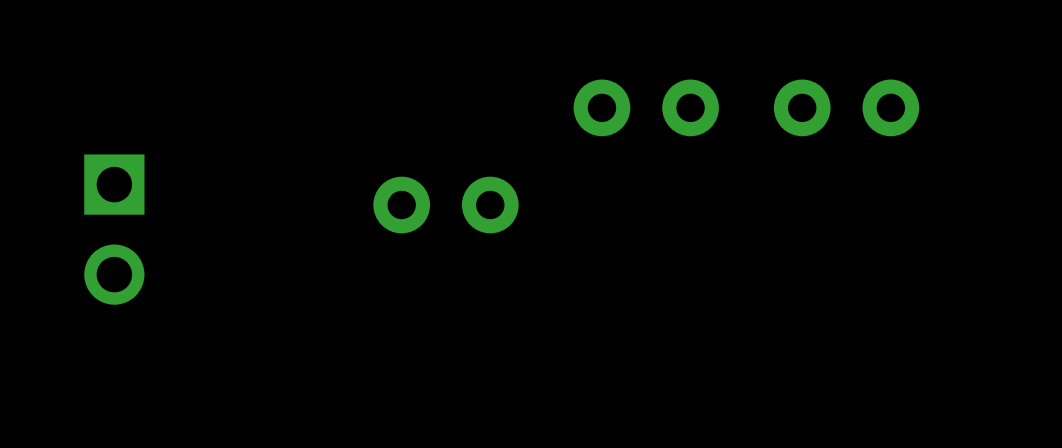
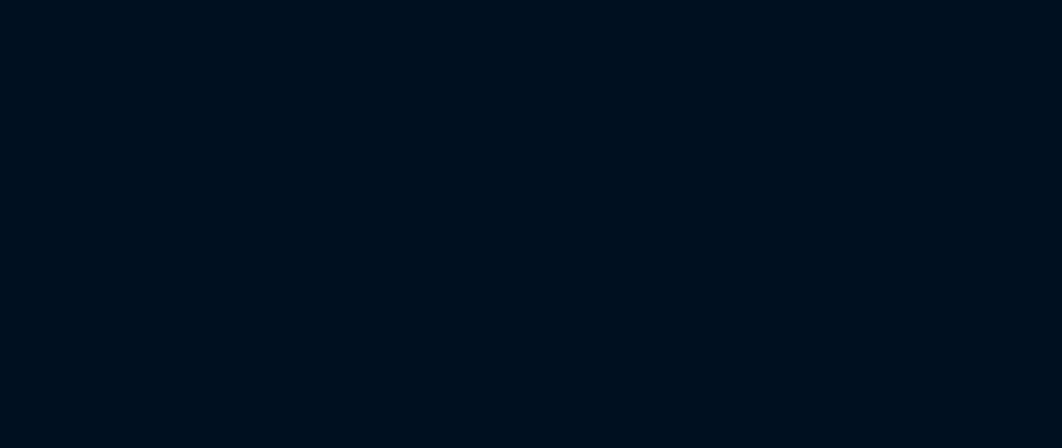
part: (646, 107) -> none
part: (846, 107) -> none
part: (446, 205) -> none
part: (114, 229) -> none

